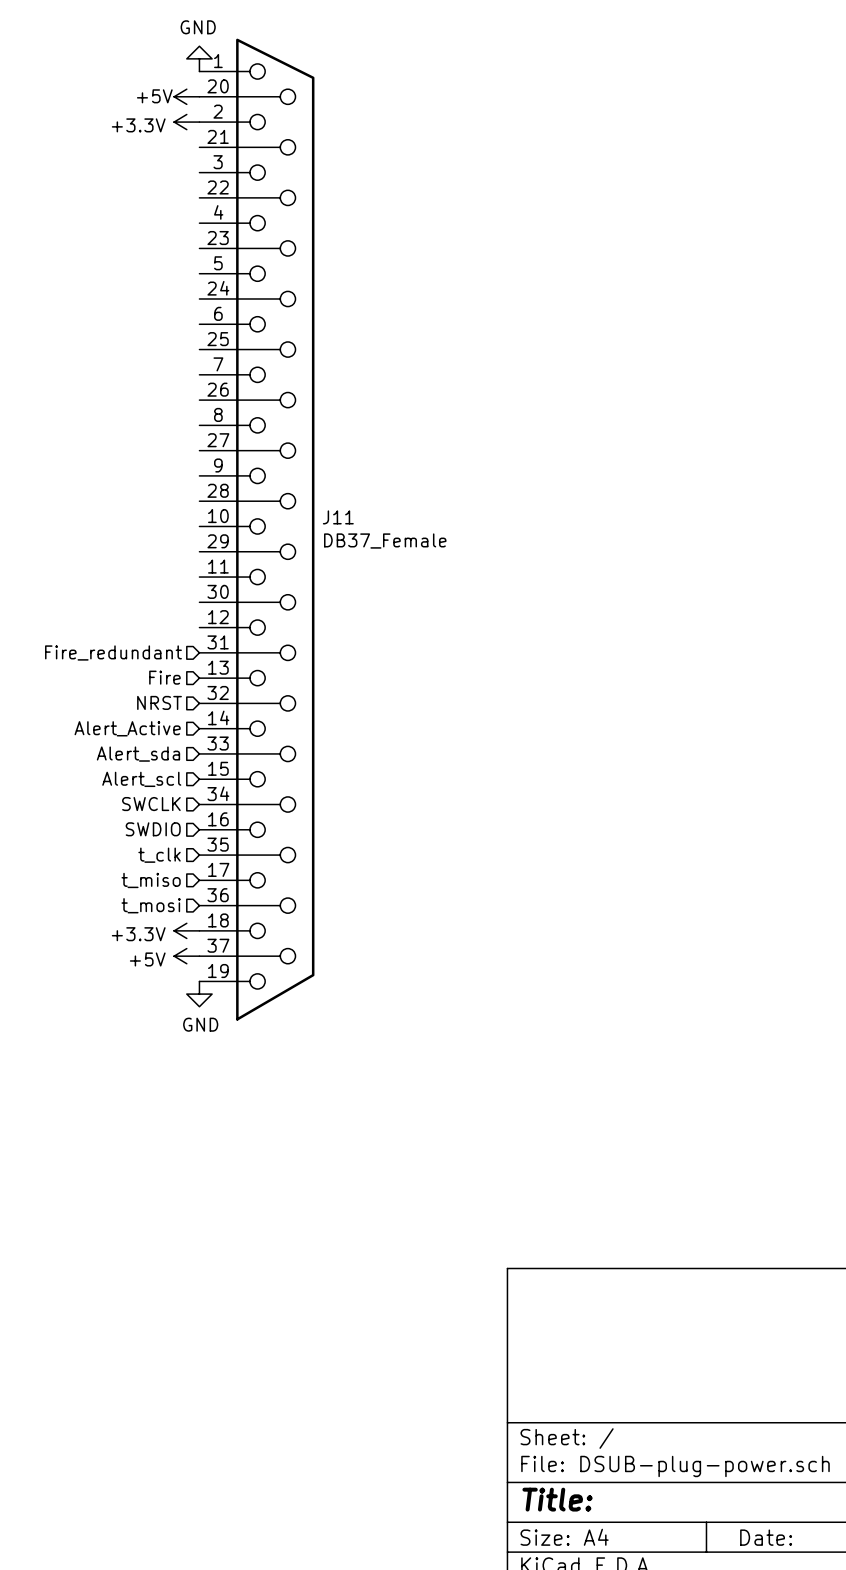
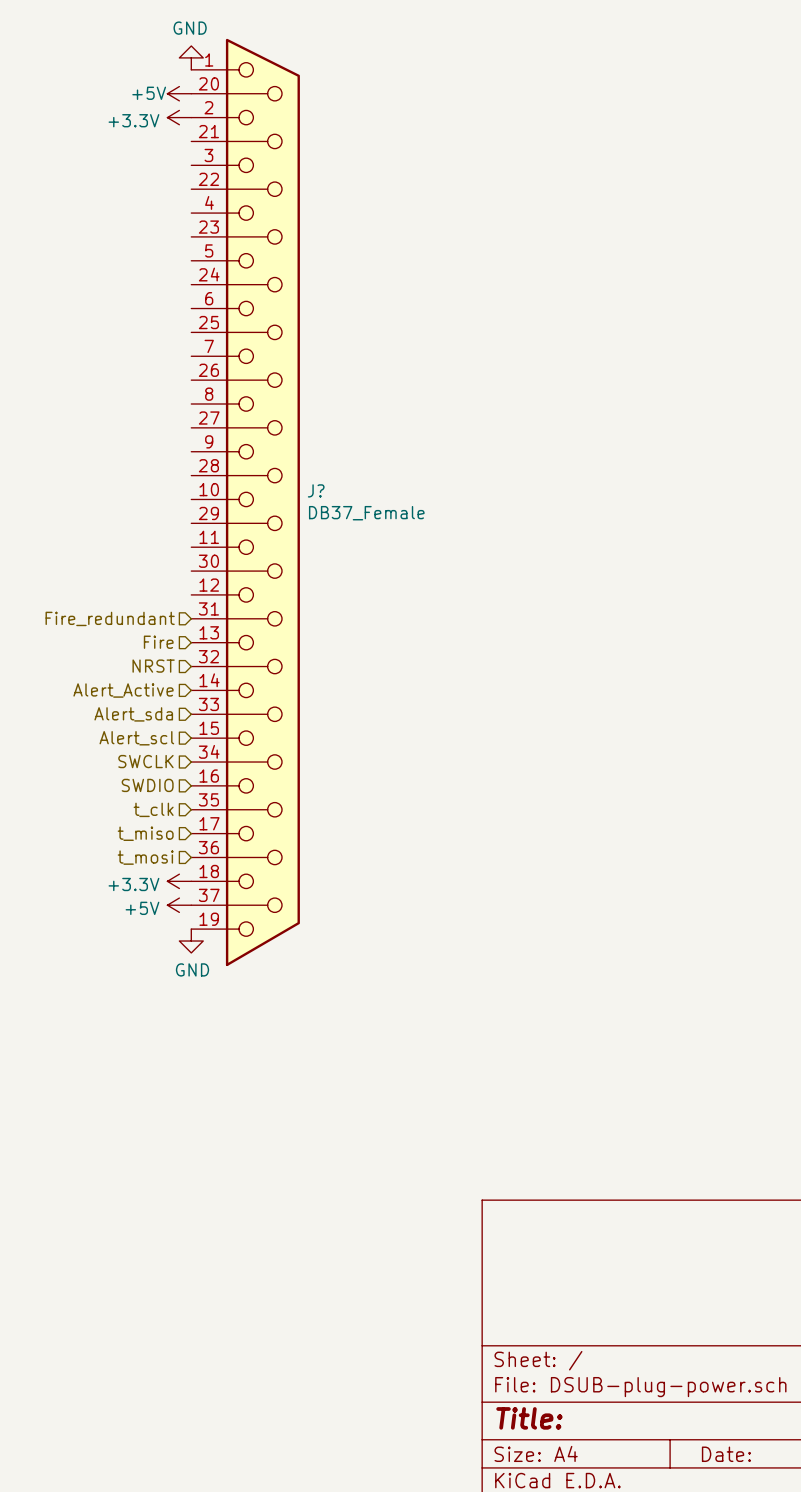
J11 name: J11 (338, 517) -> J? (316, 490)

